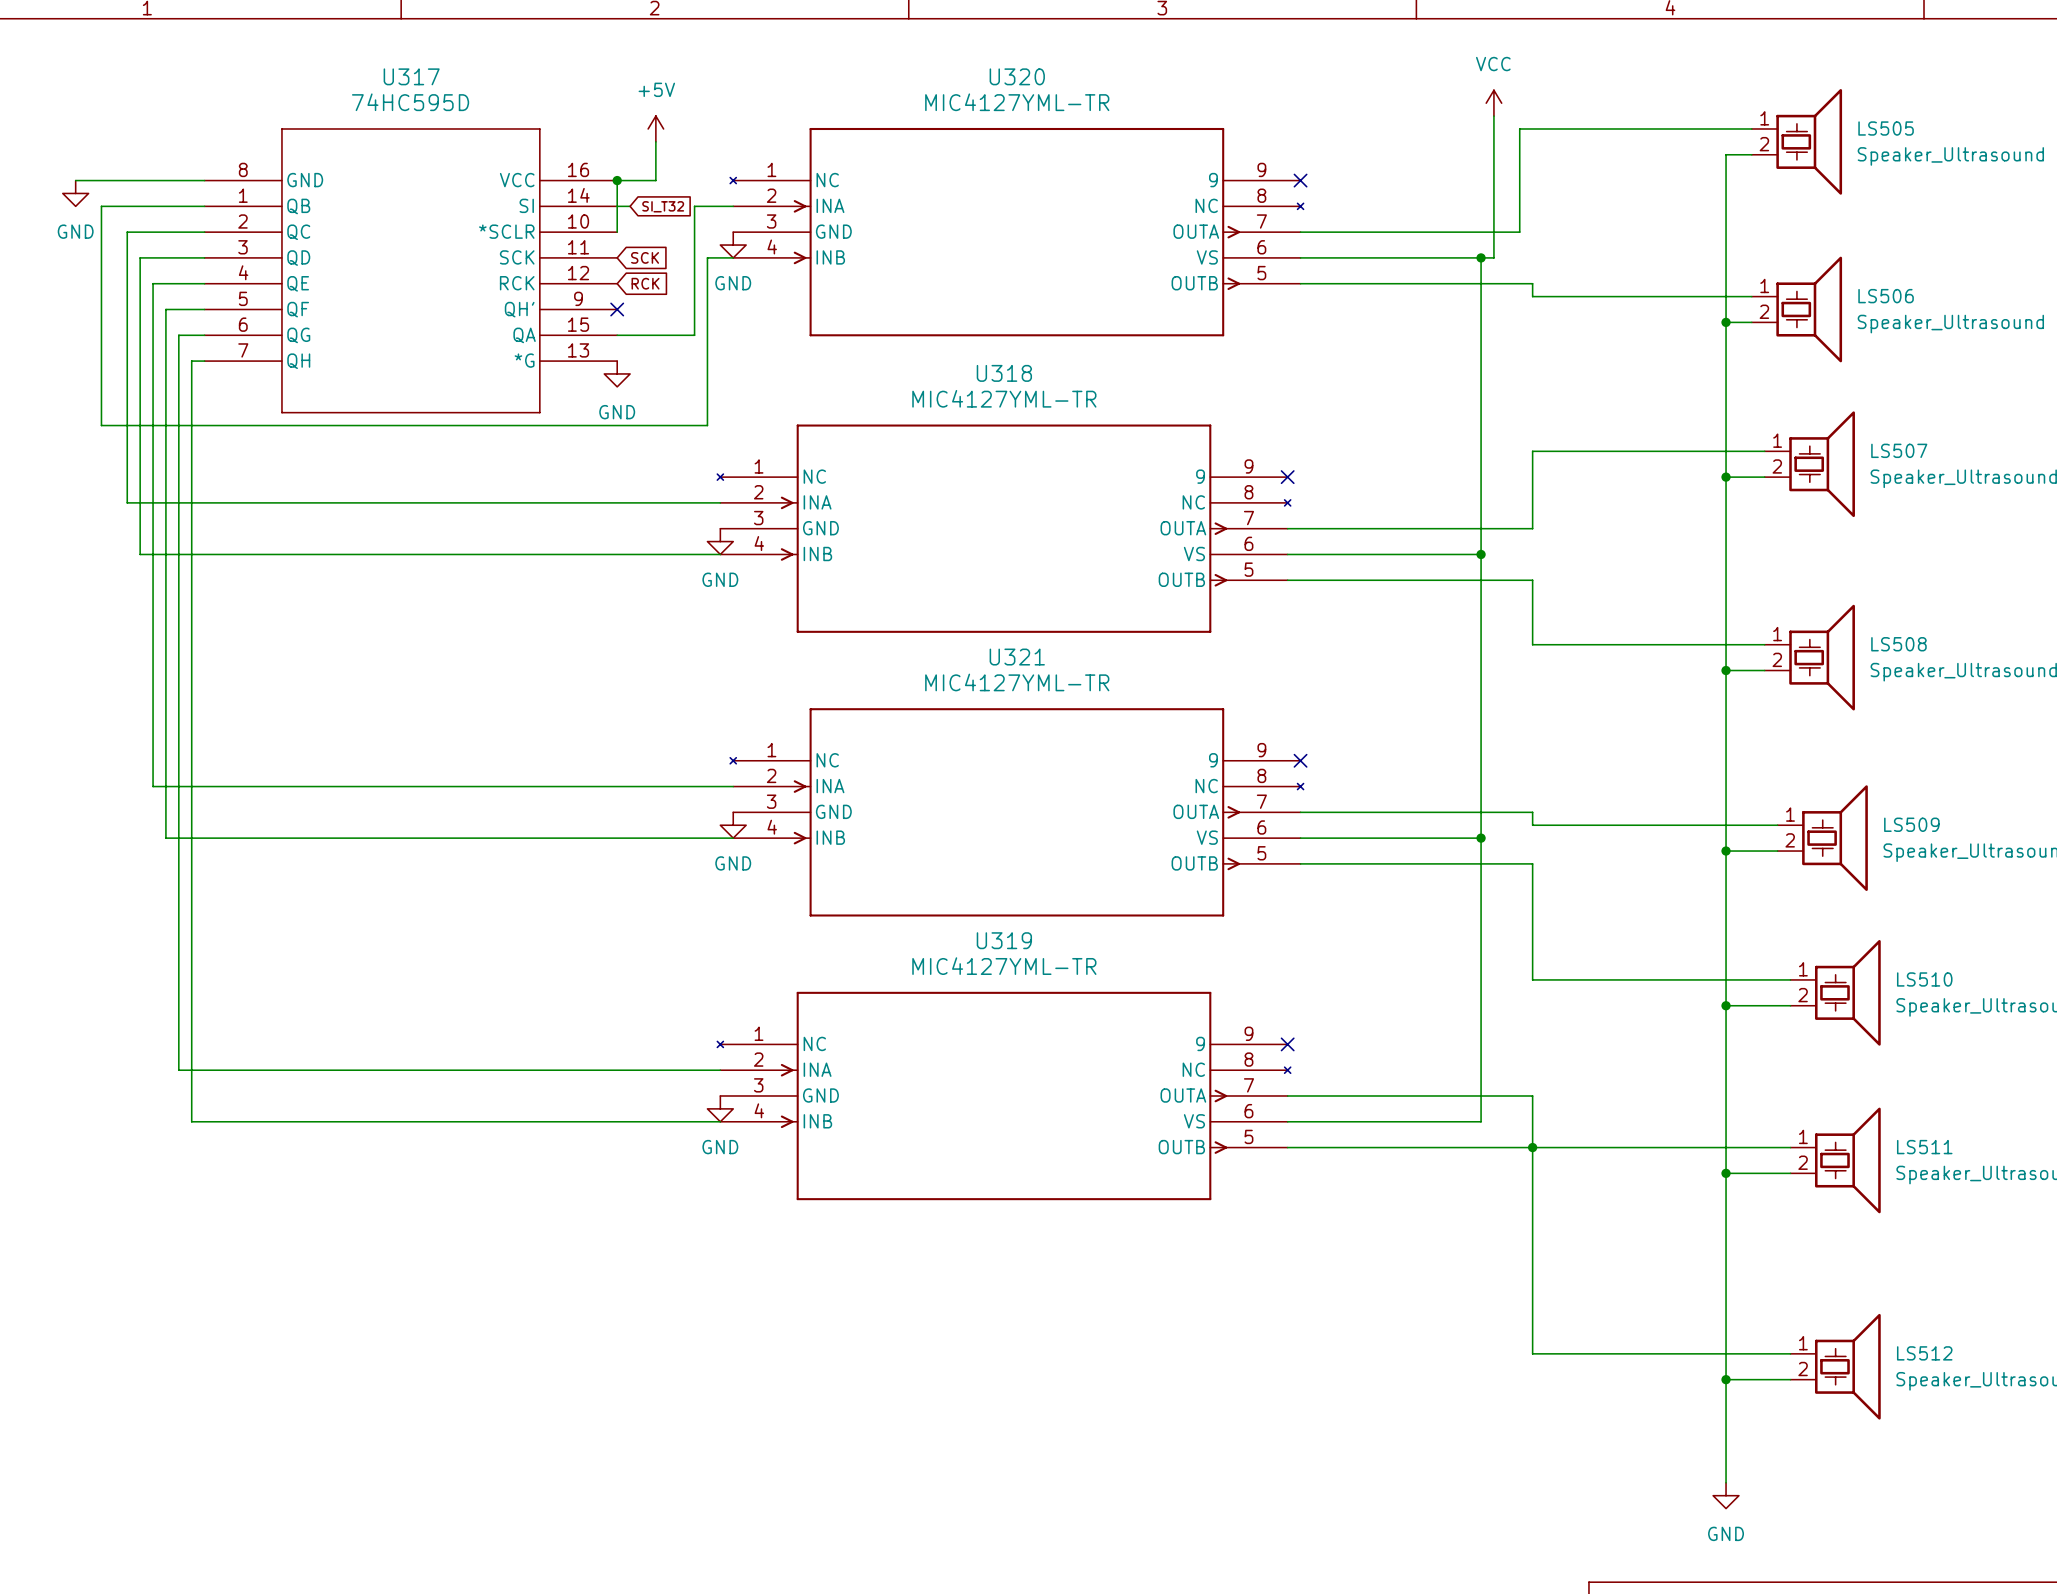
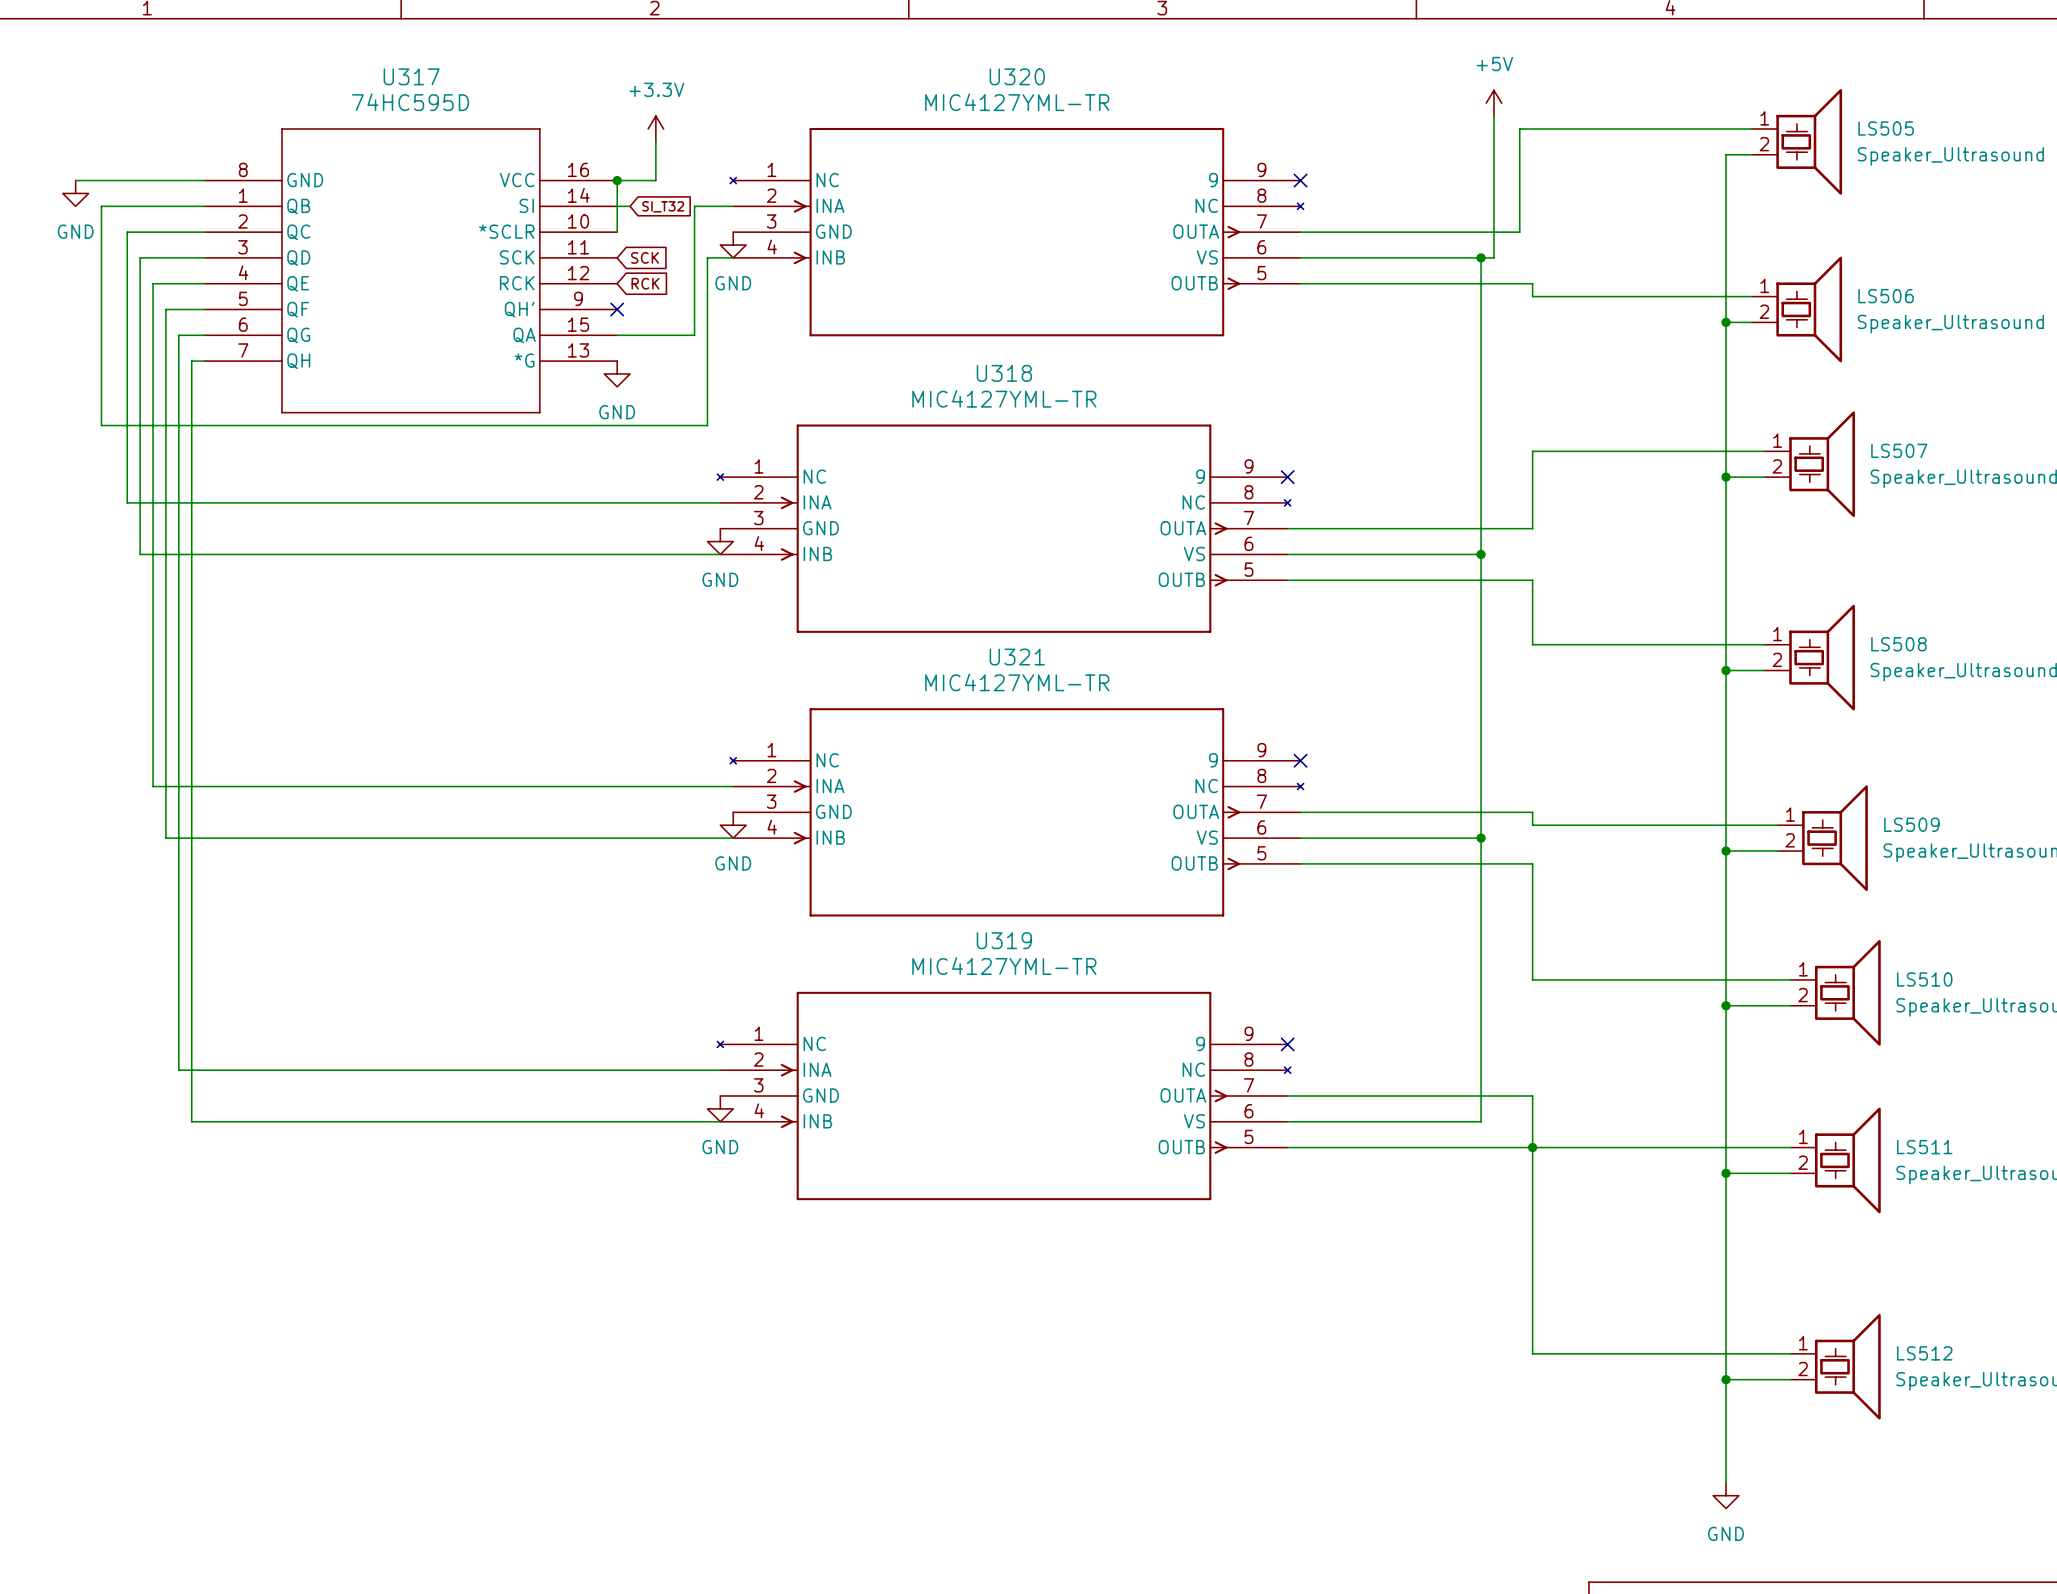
power symbol: VCC (1493, 103) -> +5V (1493, 103)
power symbol: +5V (655, 128) -> +3.3V (655, 128)

